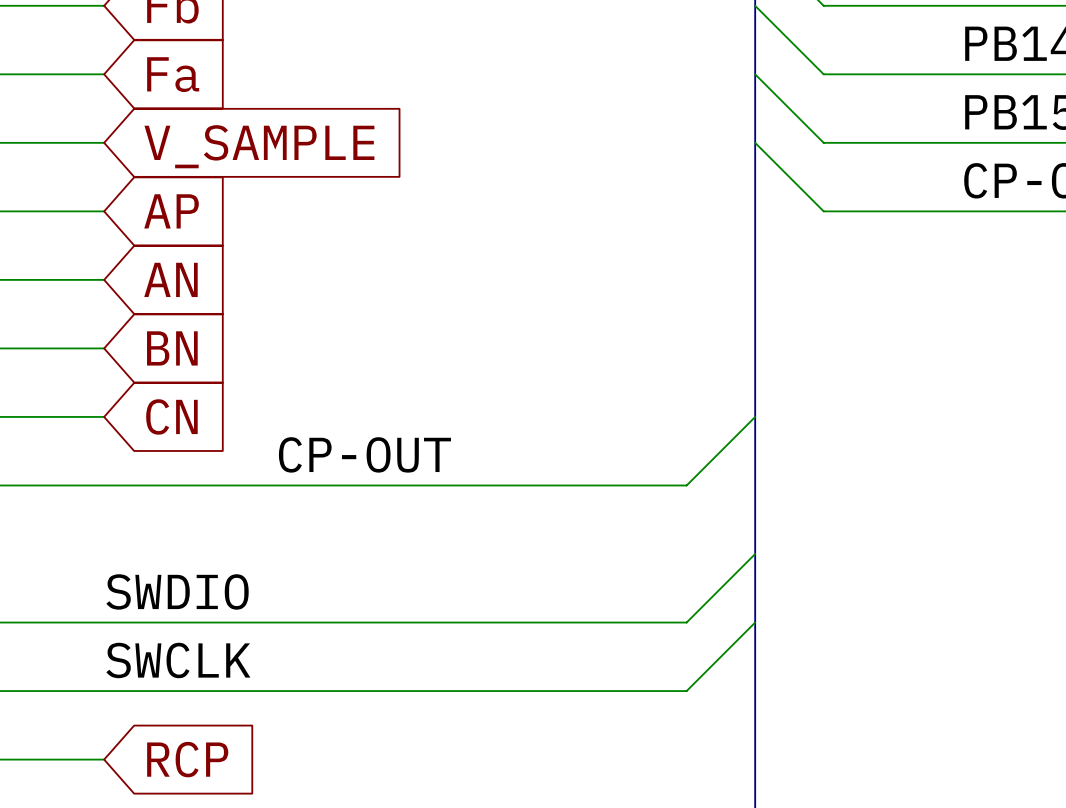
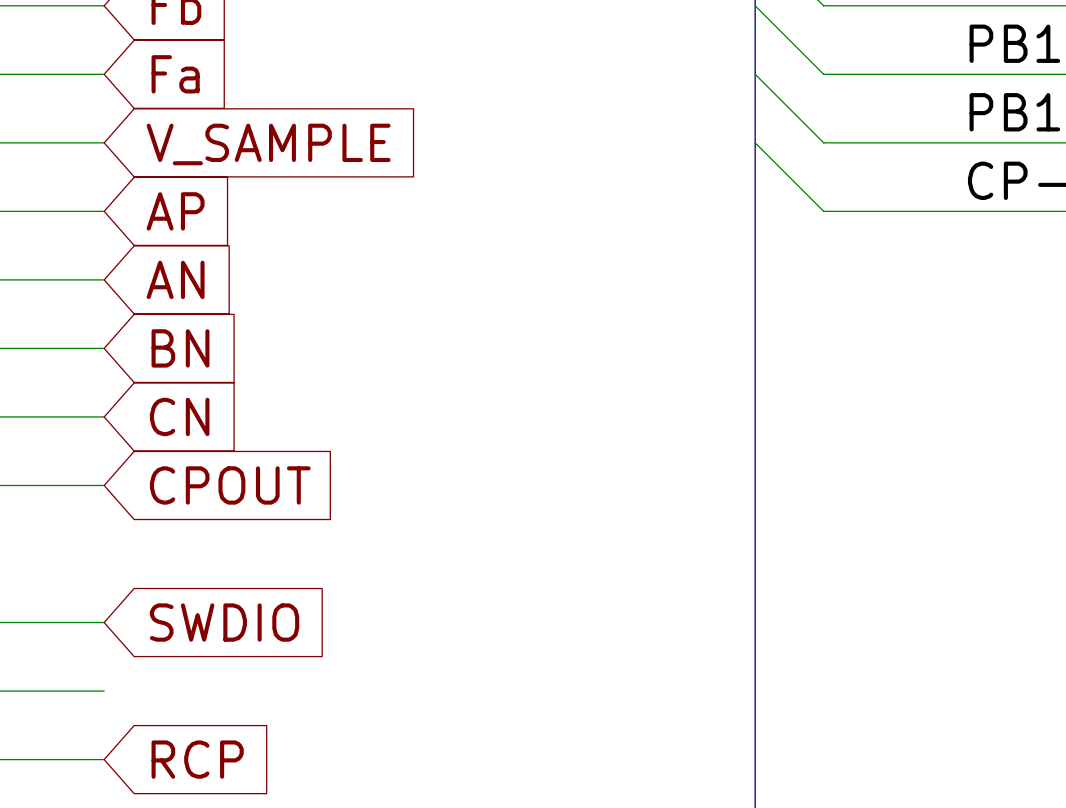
wire: (755, 416) (686, 485) (104, 485) -> none
label: CP-OUT (364, 454) -> none
global label: none -> CPOUT (230, 485)
wire: (755, 554) (686, 622) (104, 622) -> none
label: SWDIO (177, 591) -> none
global label: none -> SWDIO (224, 622)
wire: (755, 622) (686, 691) (104, 691) -> none
label: SWCLK (178, 660) -> none

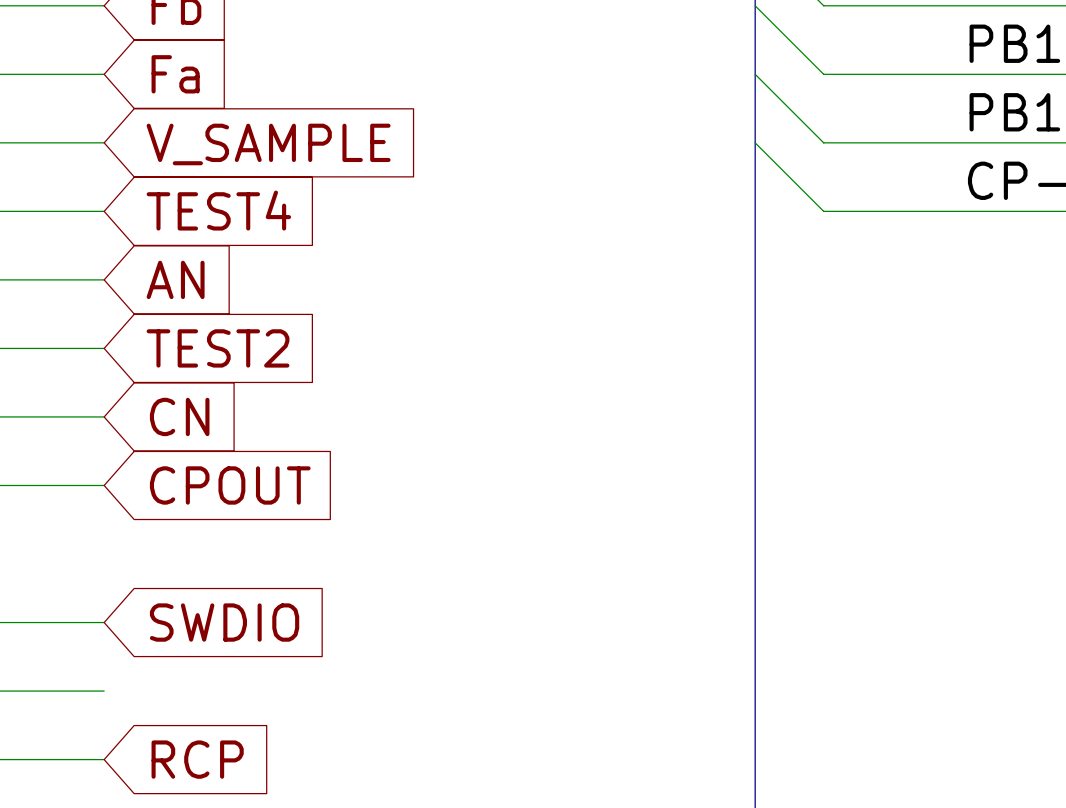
global label: AP (175, 211) -> TEST4 (218, 210)
global label: BN (180, 348) -> TEST2 (218, 348)

